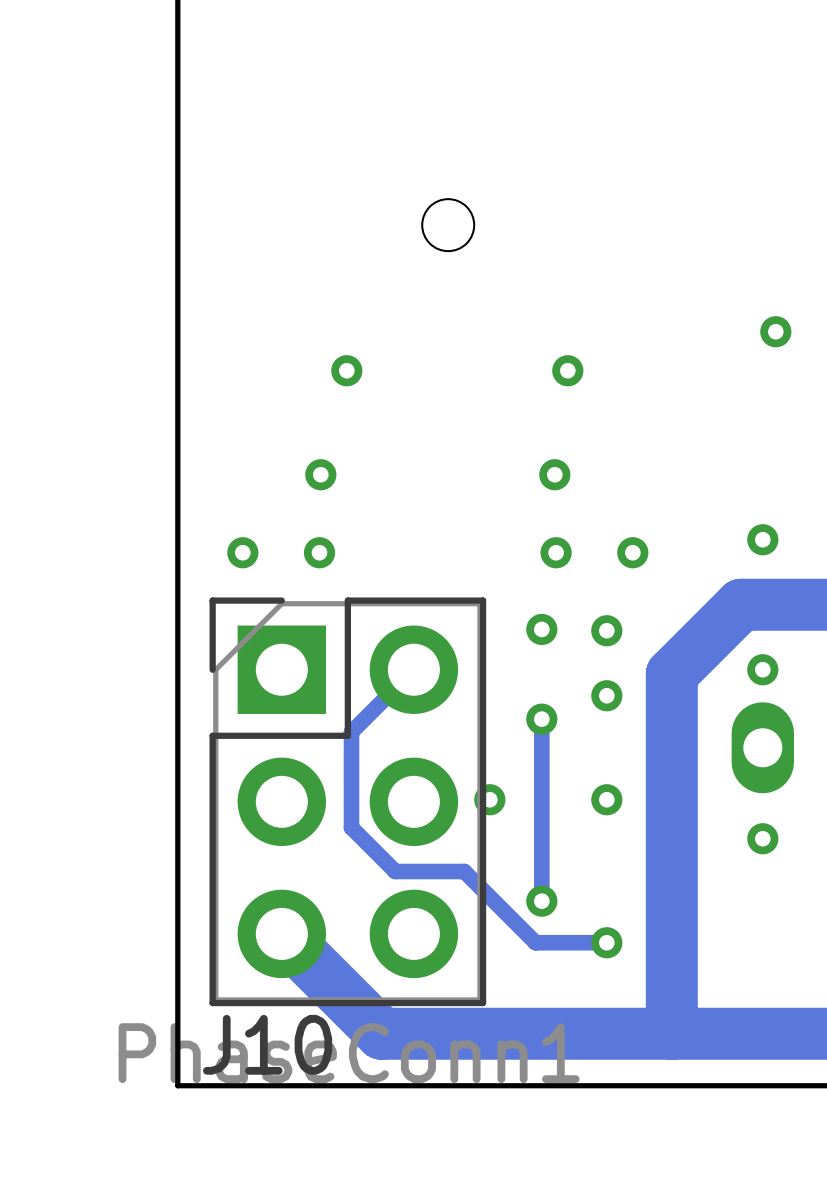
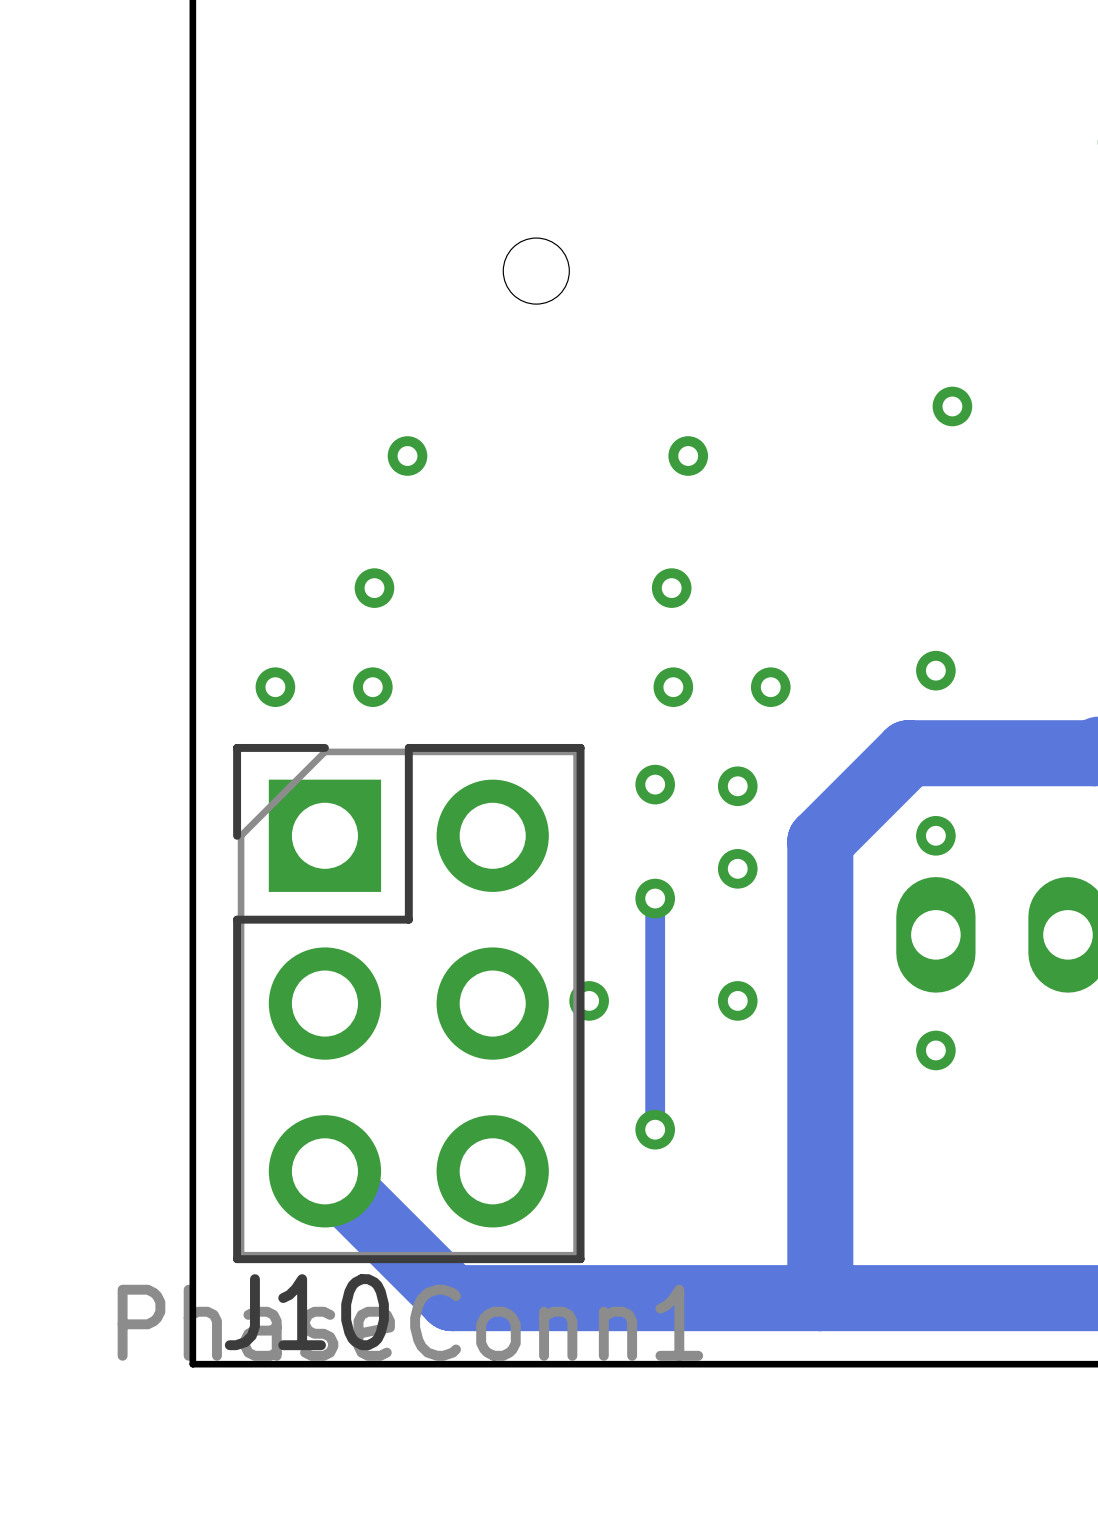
track: (413, 669) (351, 732) (351, 827) (395, 871) (464, 871) (535, 942) (606, 942) -> none
via: (606, 942) -> none

